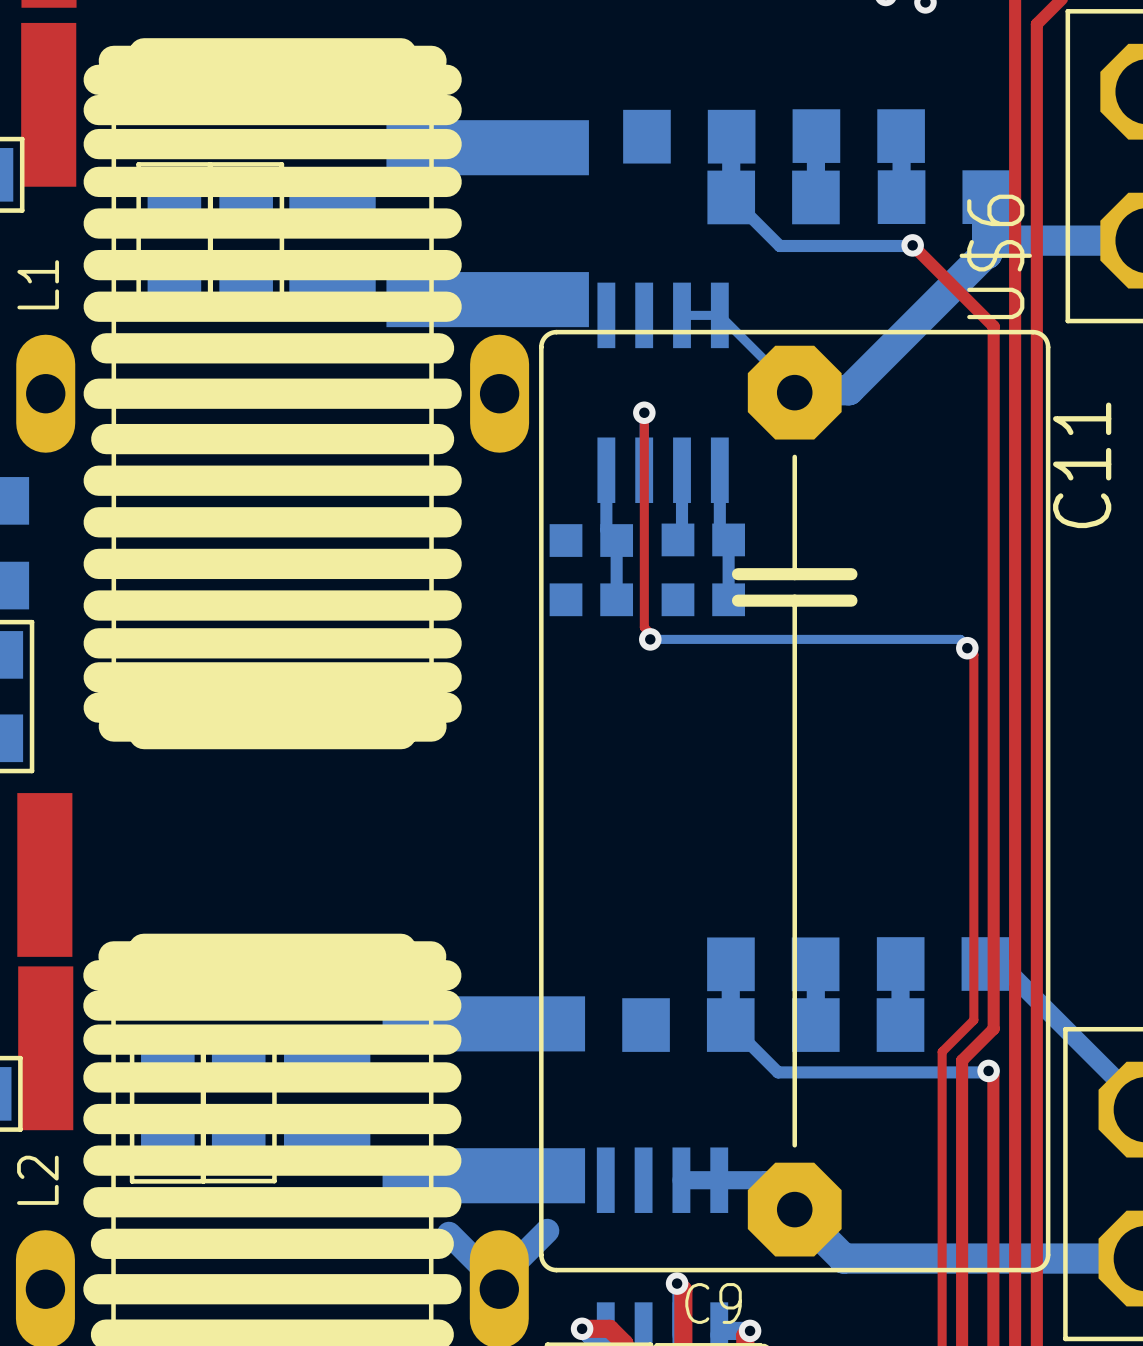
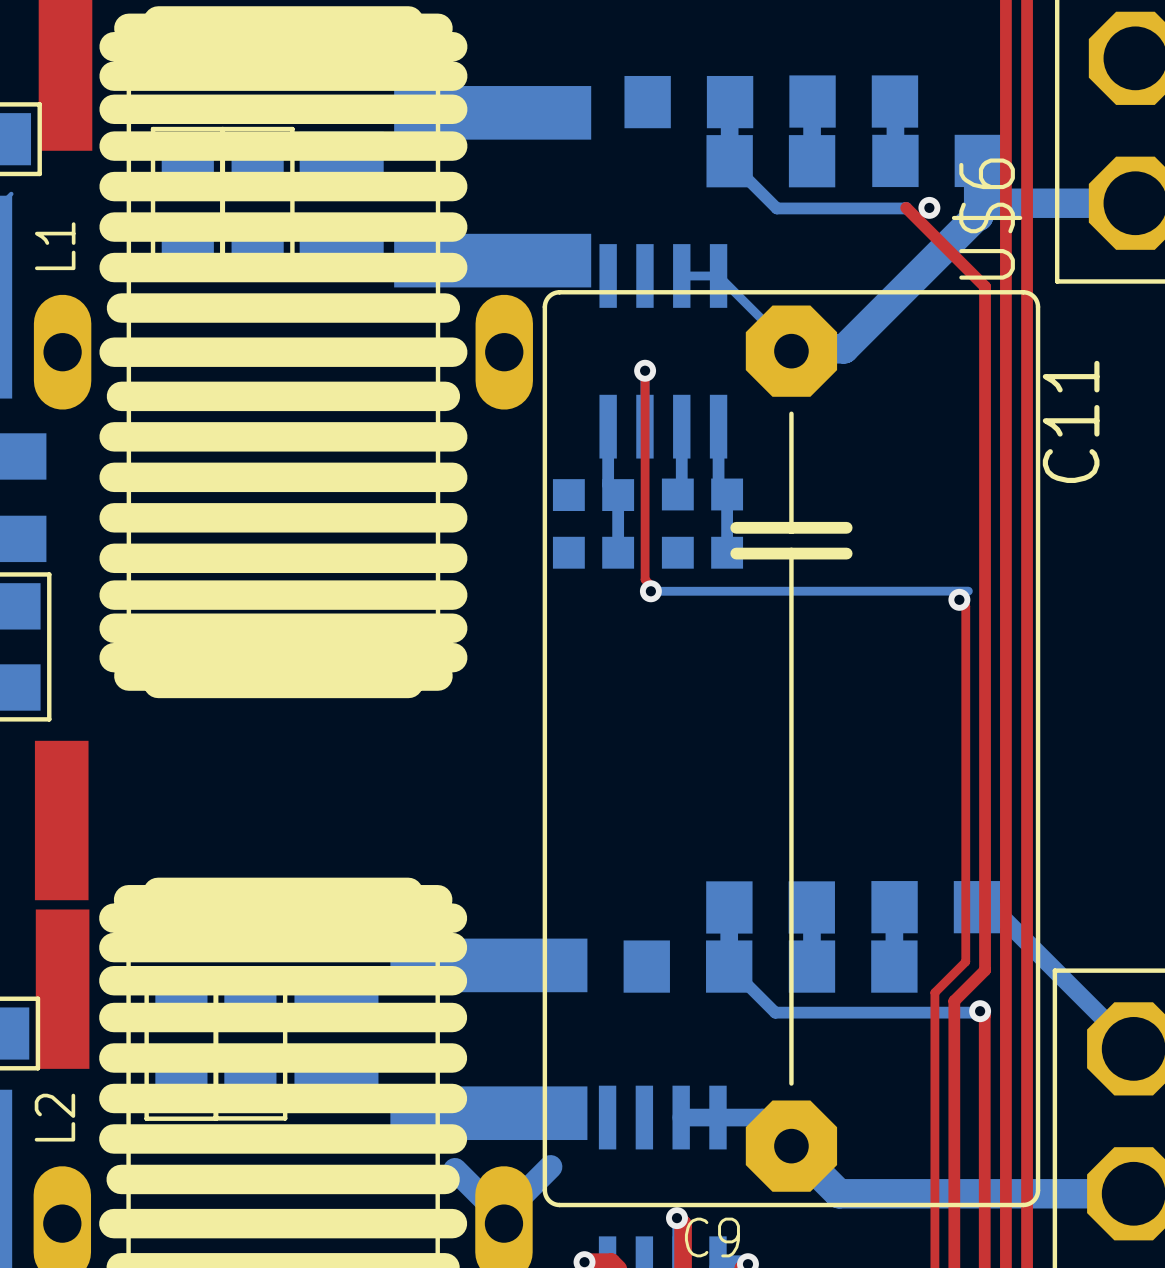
via position: (912, 245) -> (929, 207)
bottom track: (650, 639) (960, 639) -> (650, 591) (968, 591)

